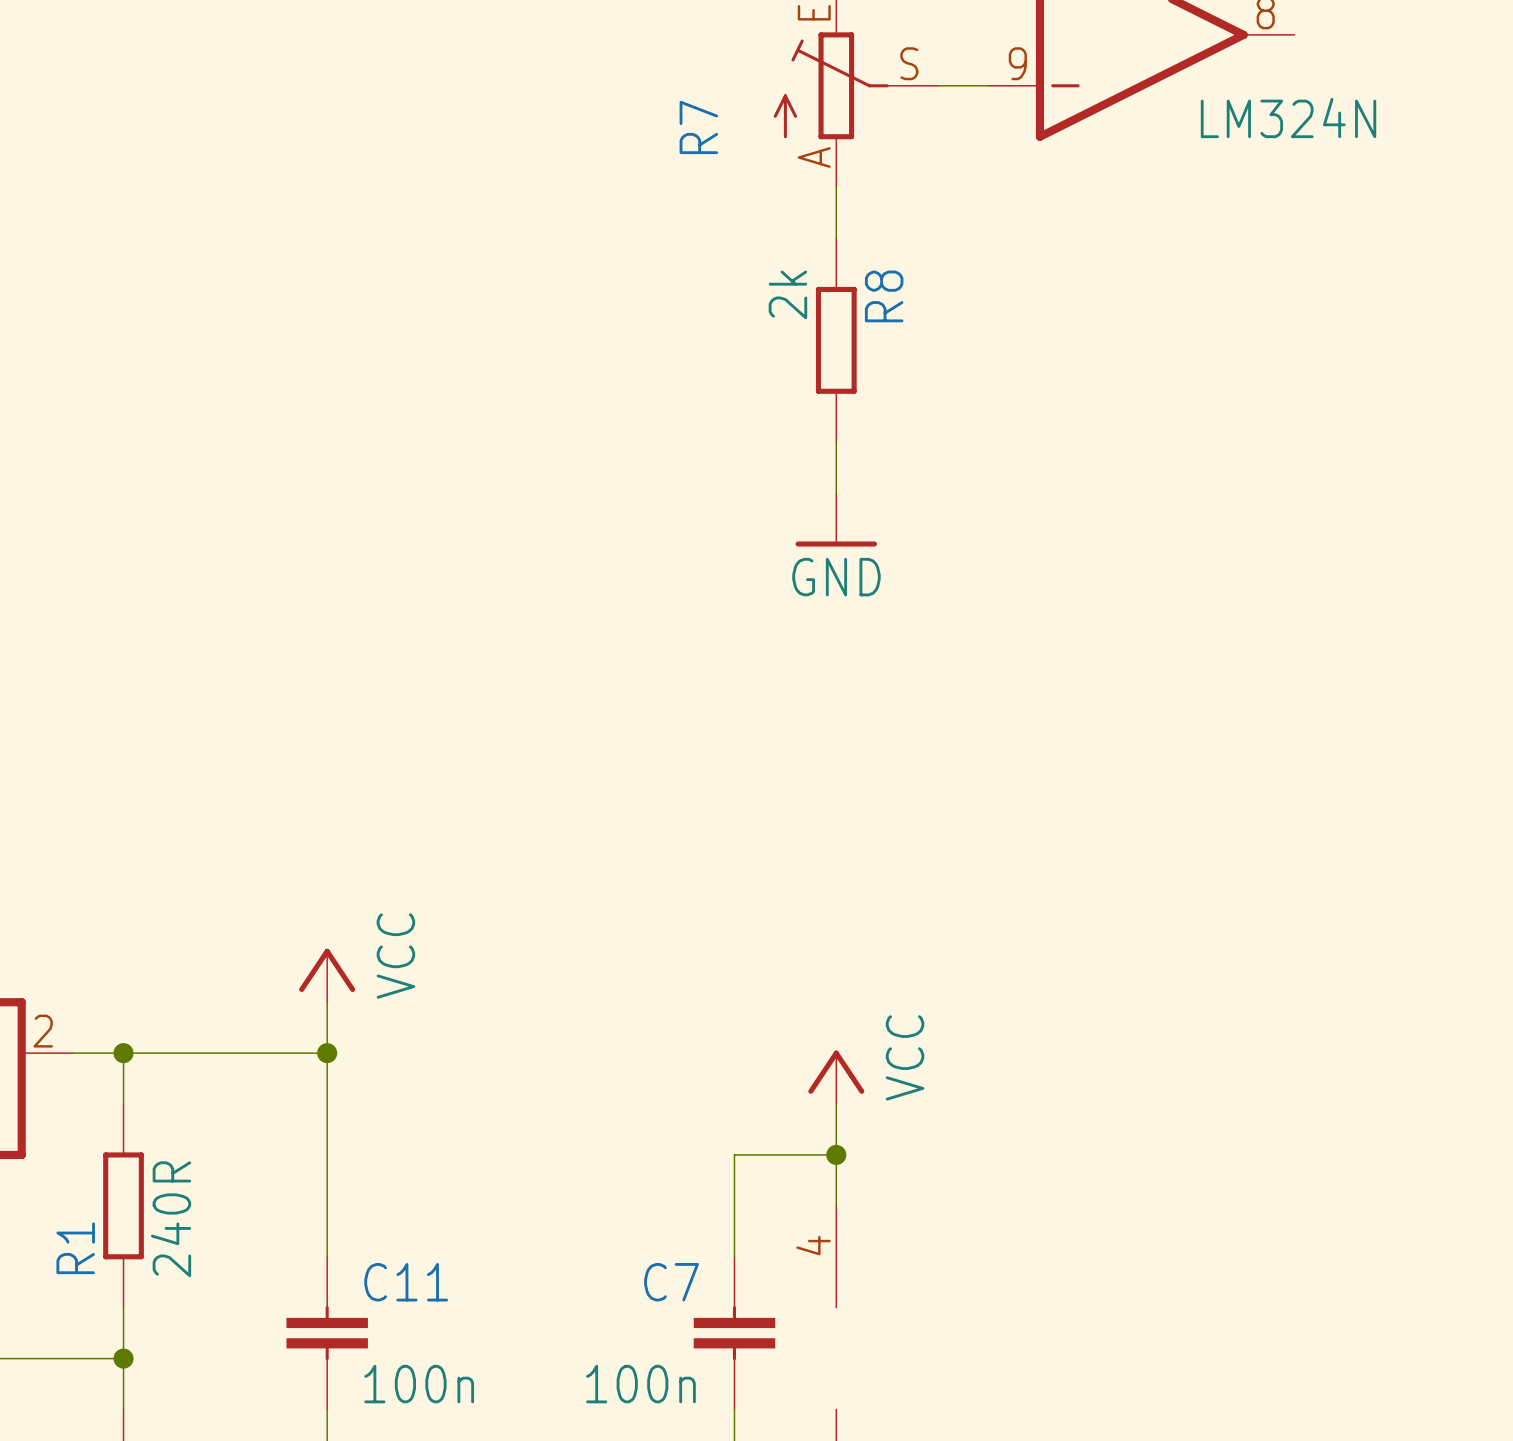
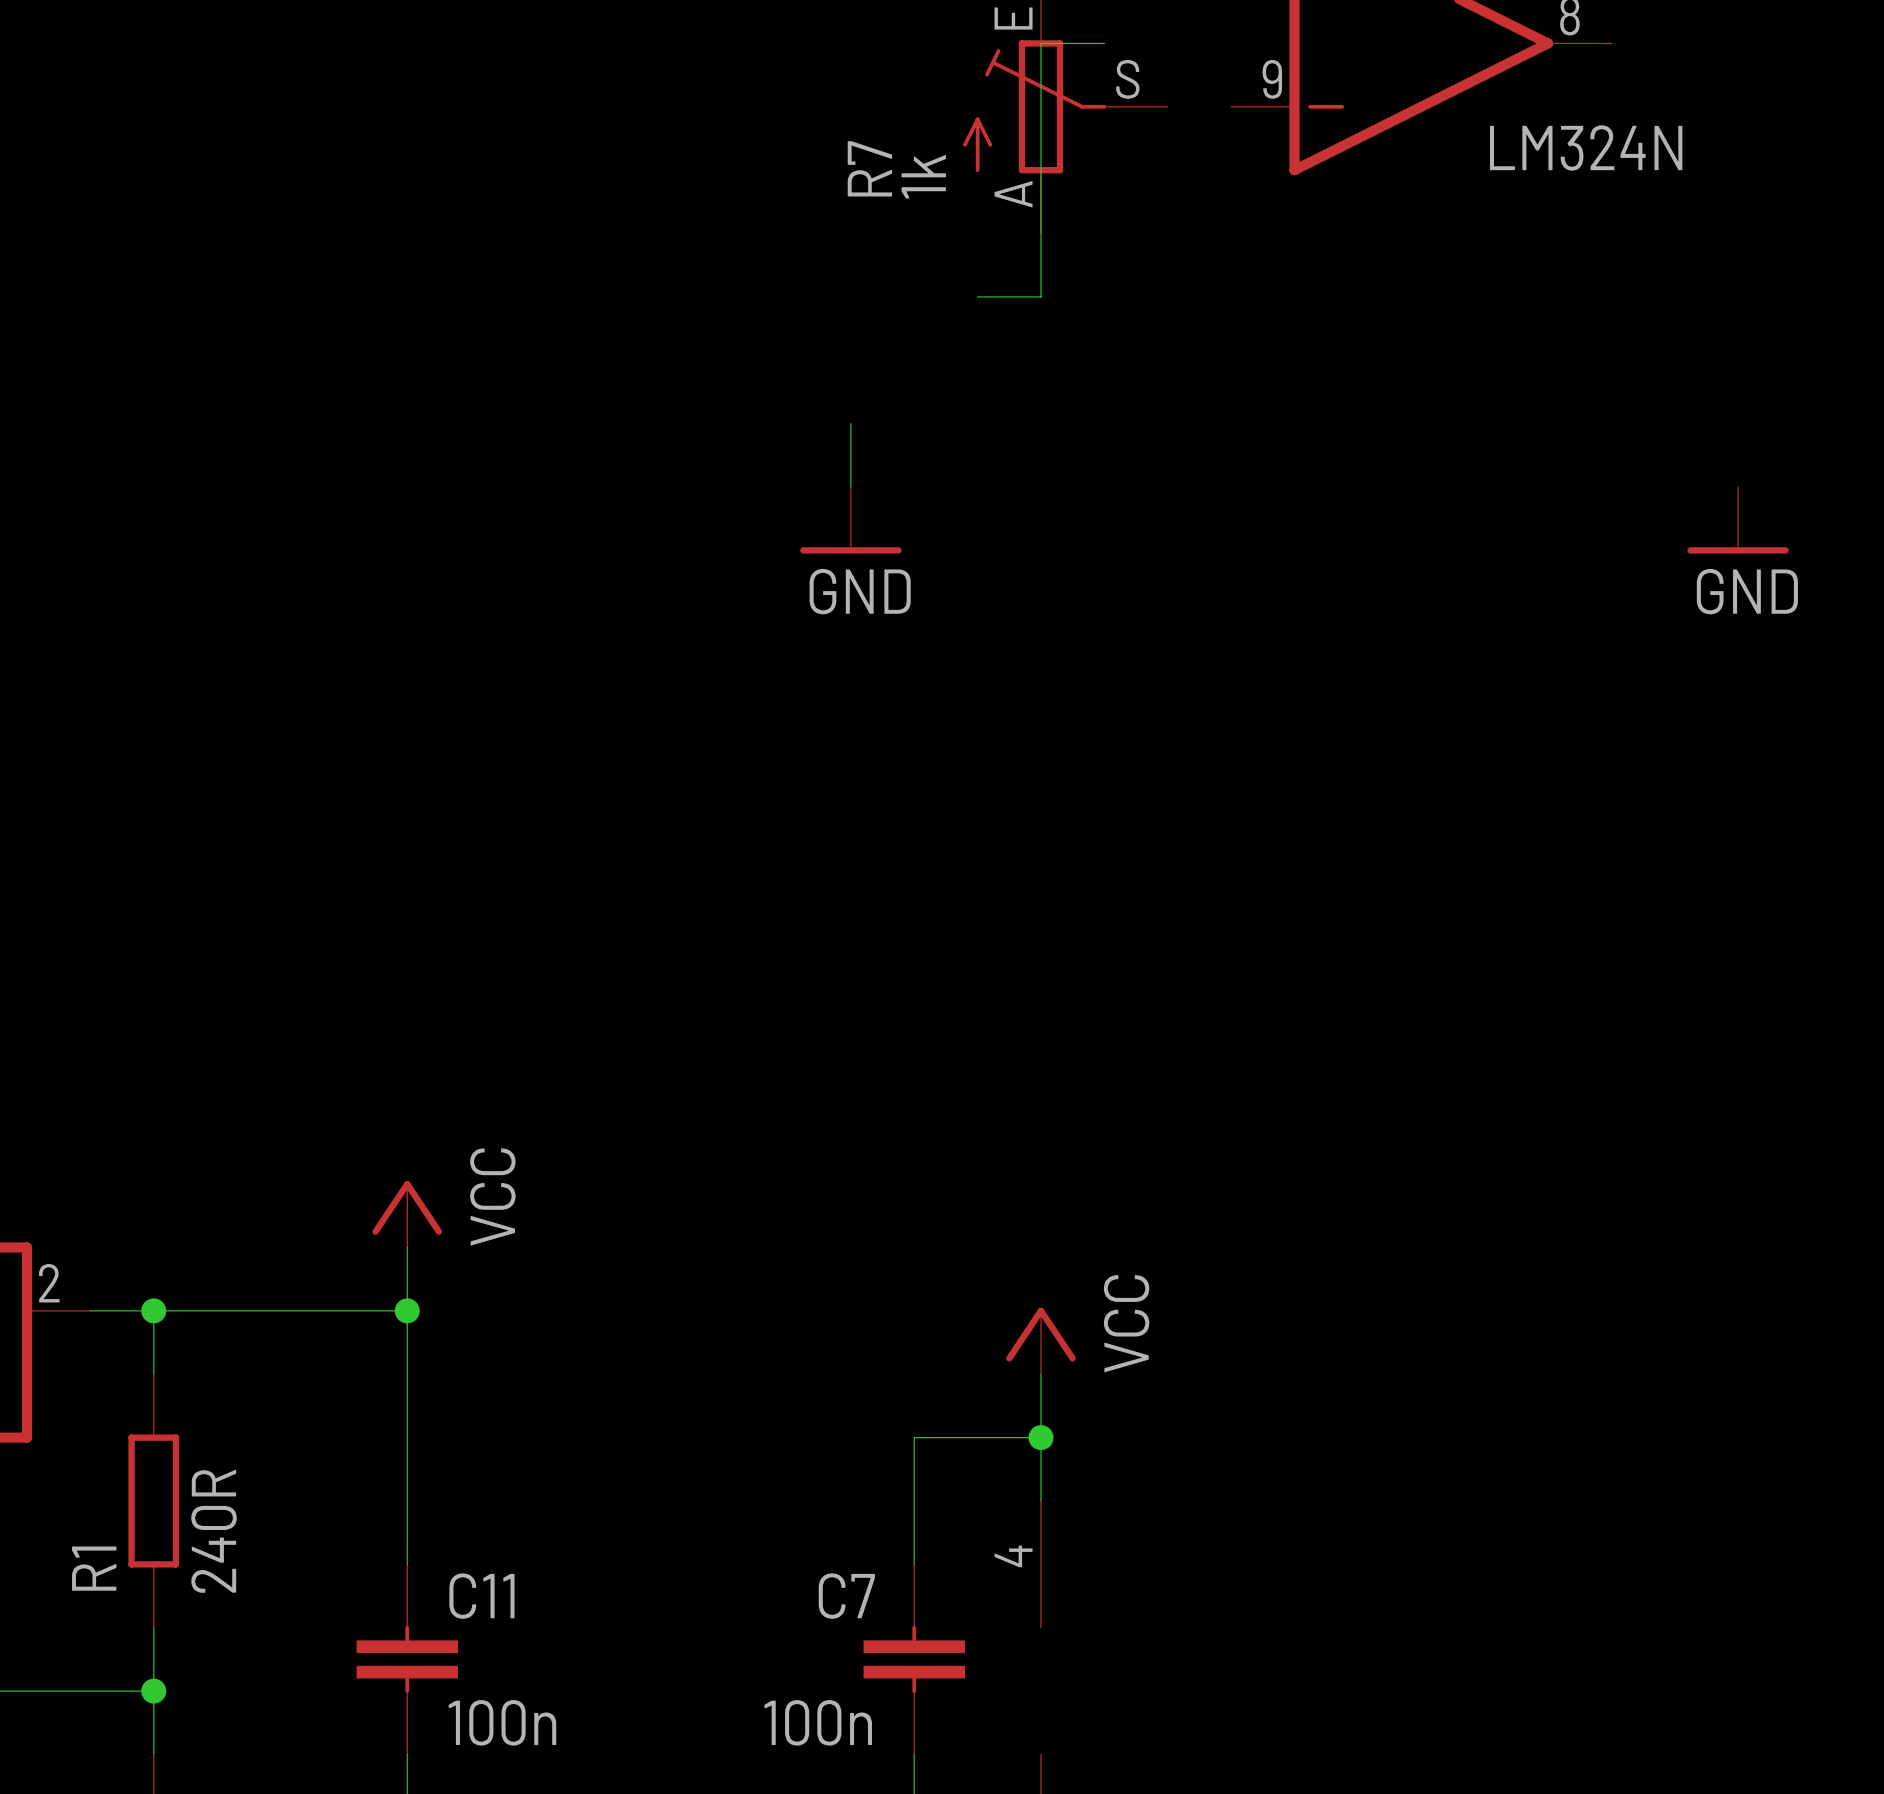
wire: none -> (1104, 43) (1040, 43) (1040, 233)
wire: (938, 85) (989, 85) -> (977, 296) (1040, 296)
R7 value: none -> 1k (923, 176)
R8: 2k (836, 340) -> none
power symbol: none -> GND (1738, 520)
wire: (836, 442) (836, 493) -> (850, 423) (850, 487)
power symbol position: GND (836, 519) -> GND (850, 520)

